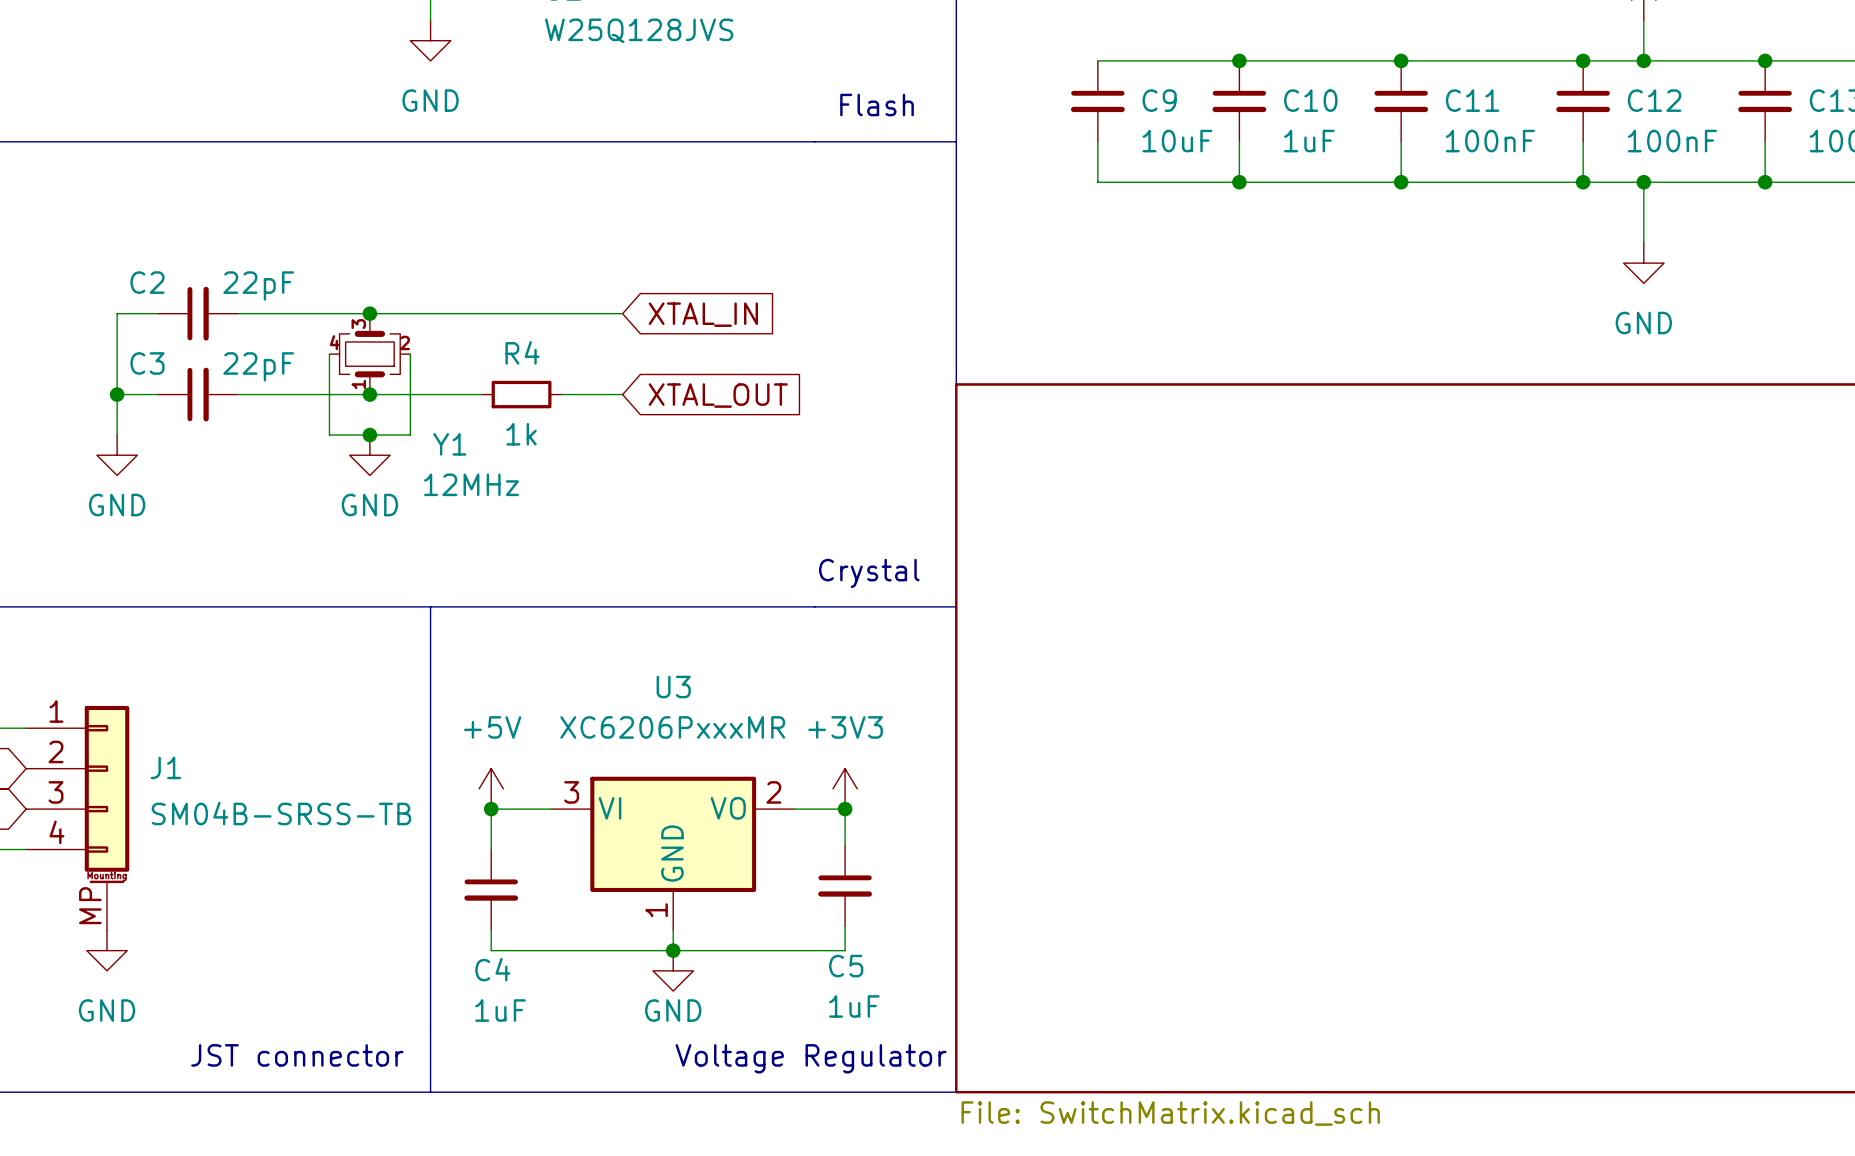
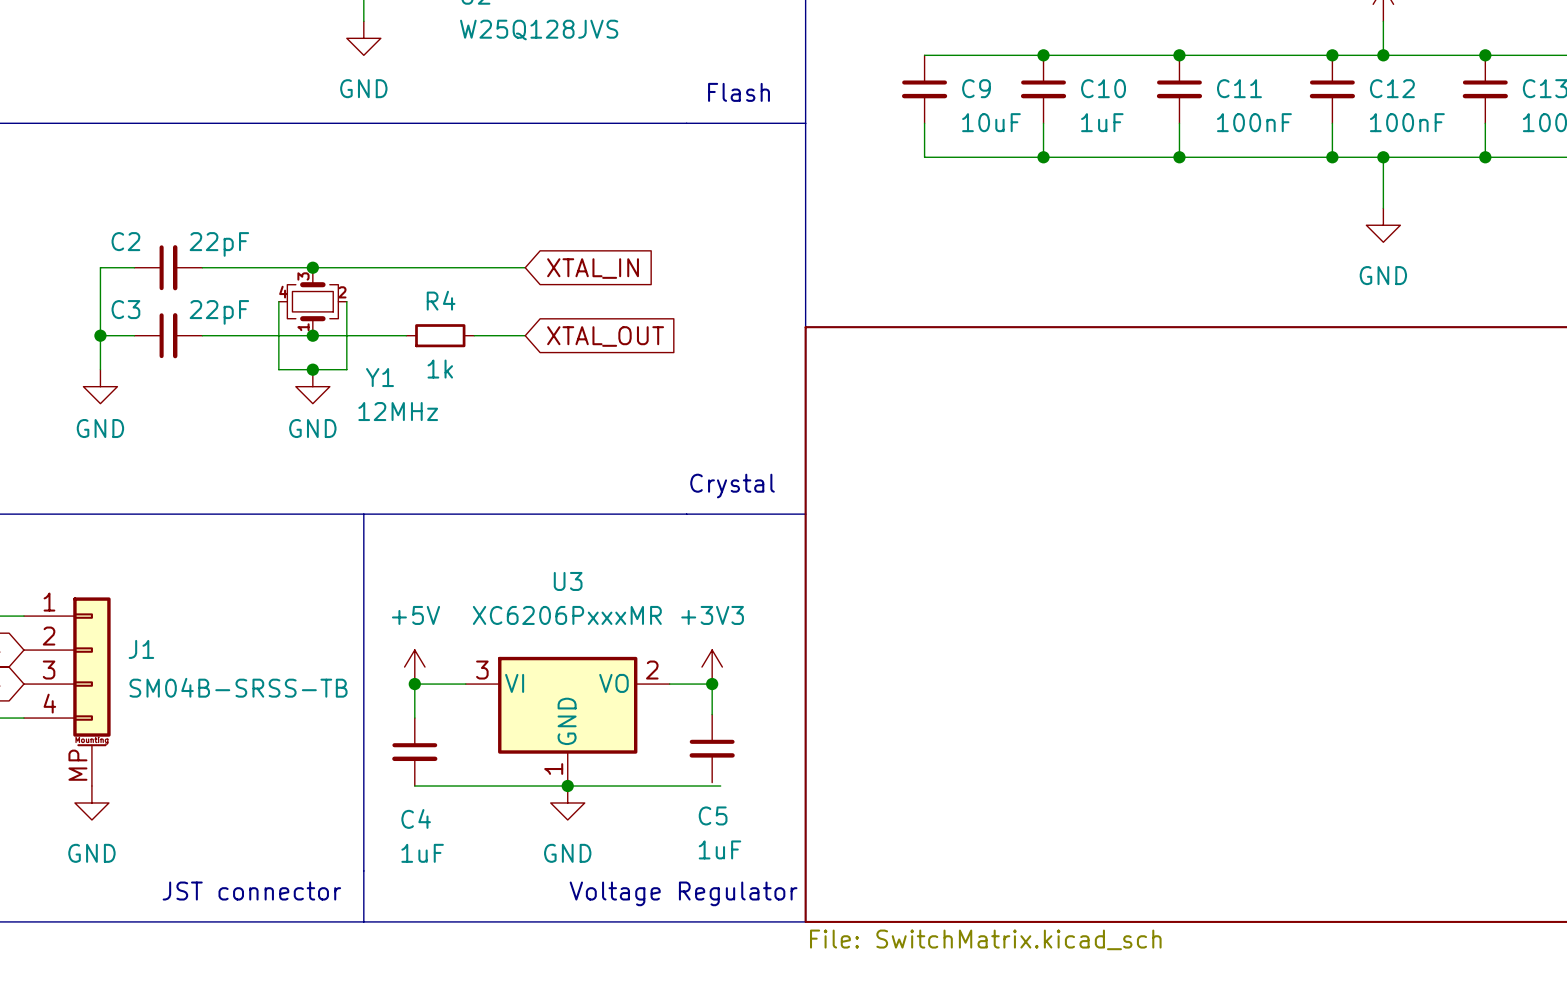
wire: (845, 926) (845, 950) (491, 950) (491, 930) -> (720, 786) (414, 786)
junction position: (673, 950) -> (567, 786)
power symbol position: GND (673, 970) -> GND (567, 802)

